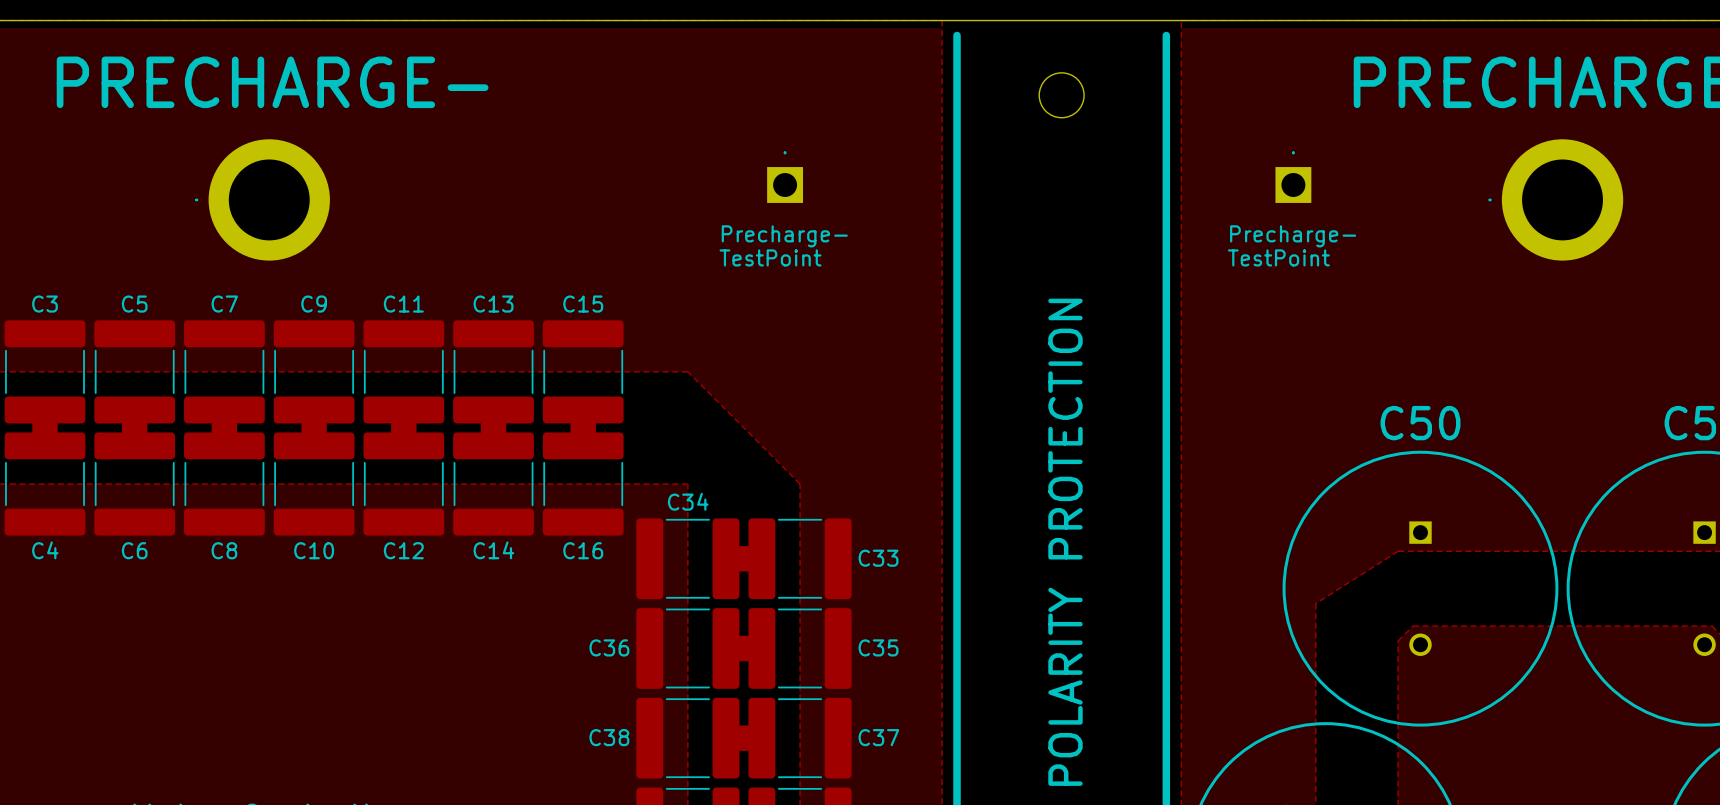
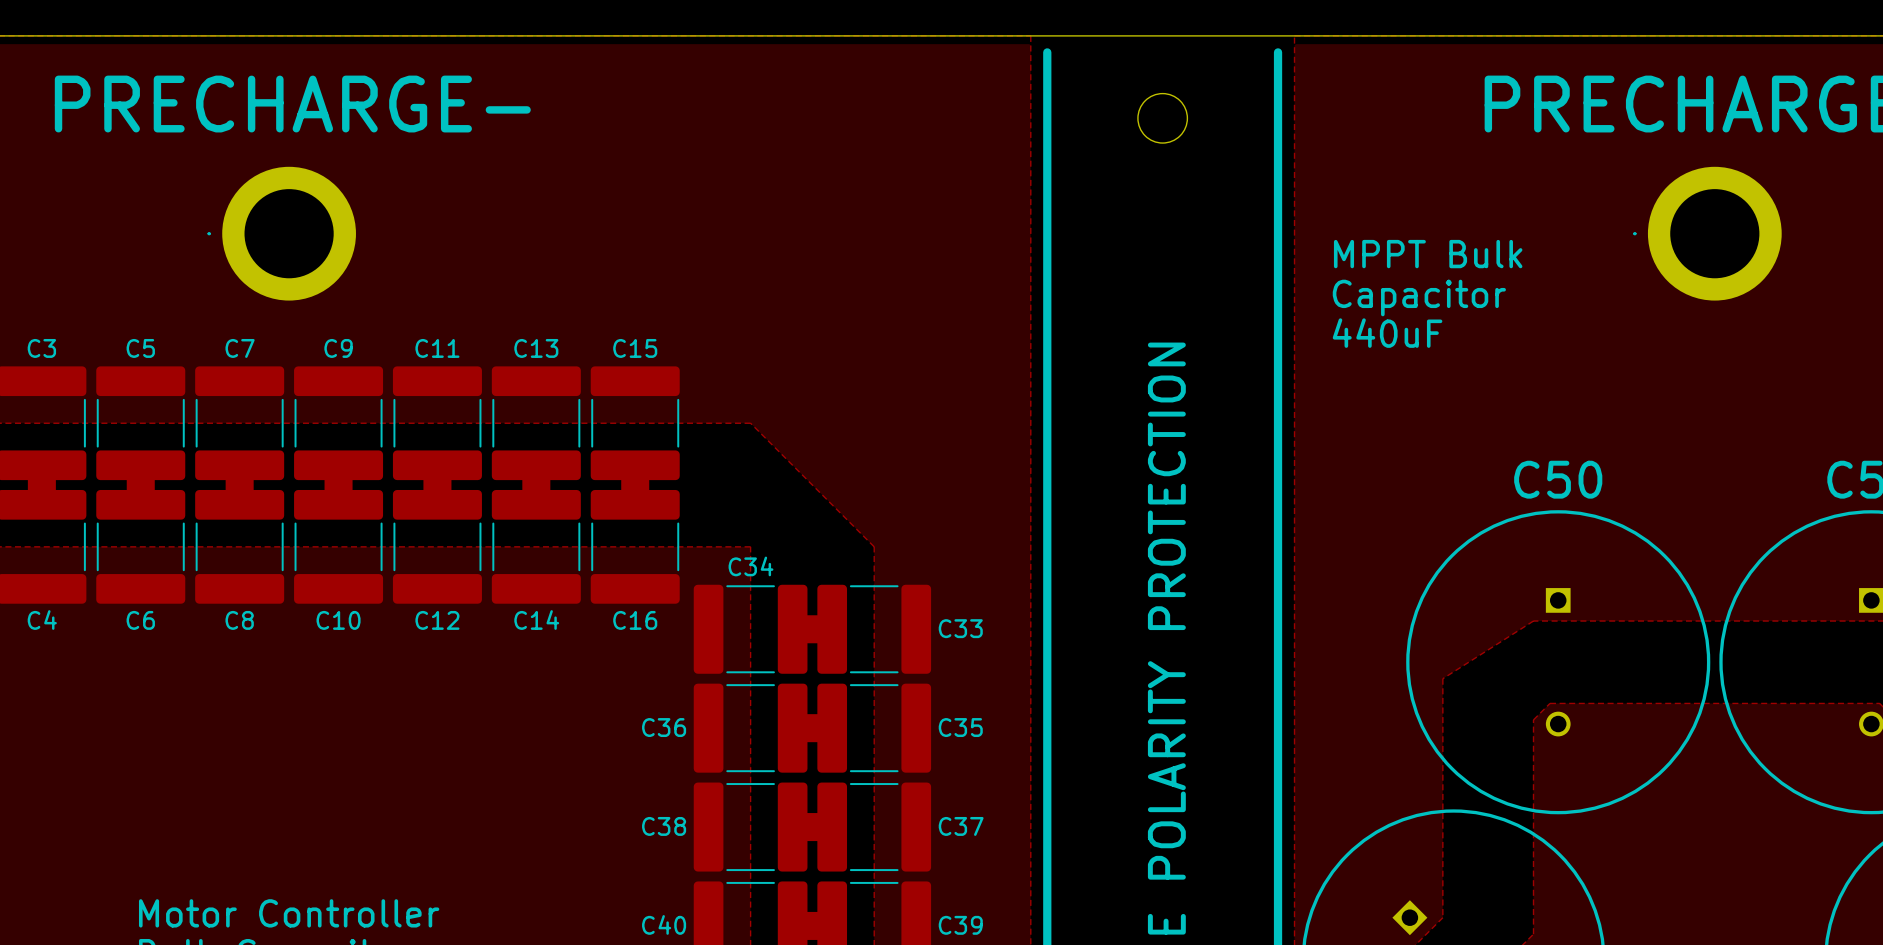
part: (785, 177) -> none
part: (1293, 177) -> none
text: none -> MPPT Bulk (1428, 254)
text: Precharge- (784, 236) -> none
text: Precharge- (1293, 236) -> none
text: TestPoint (770, 257) -> none
text: TestPoint (1278, 257) -> none
text: none -> Capacitor (1419, 297)
text: none -> 440uF (1387, 333)

